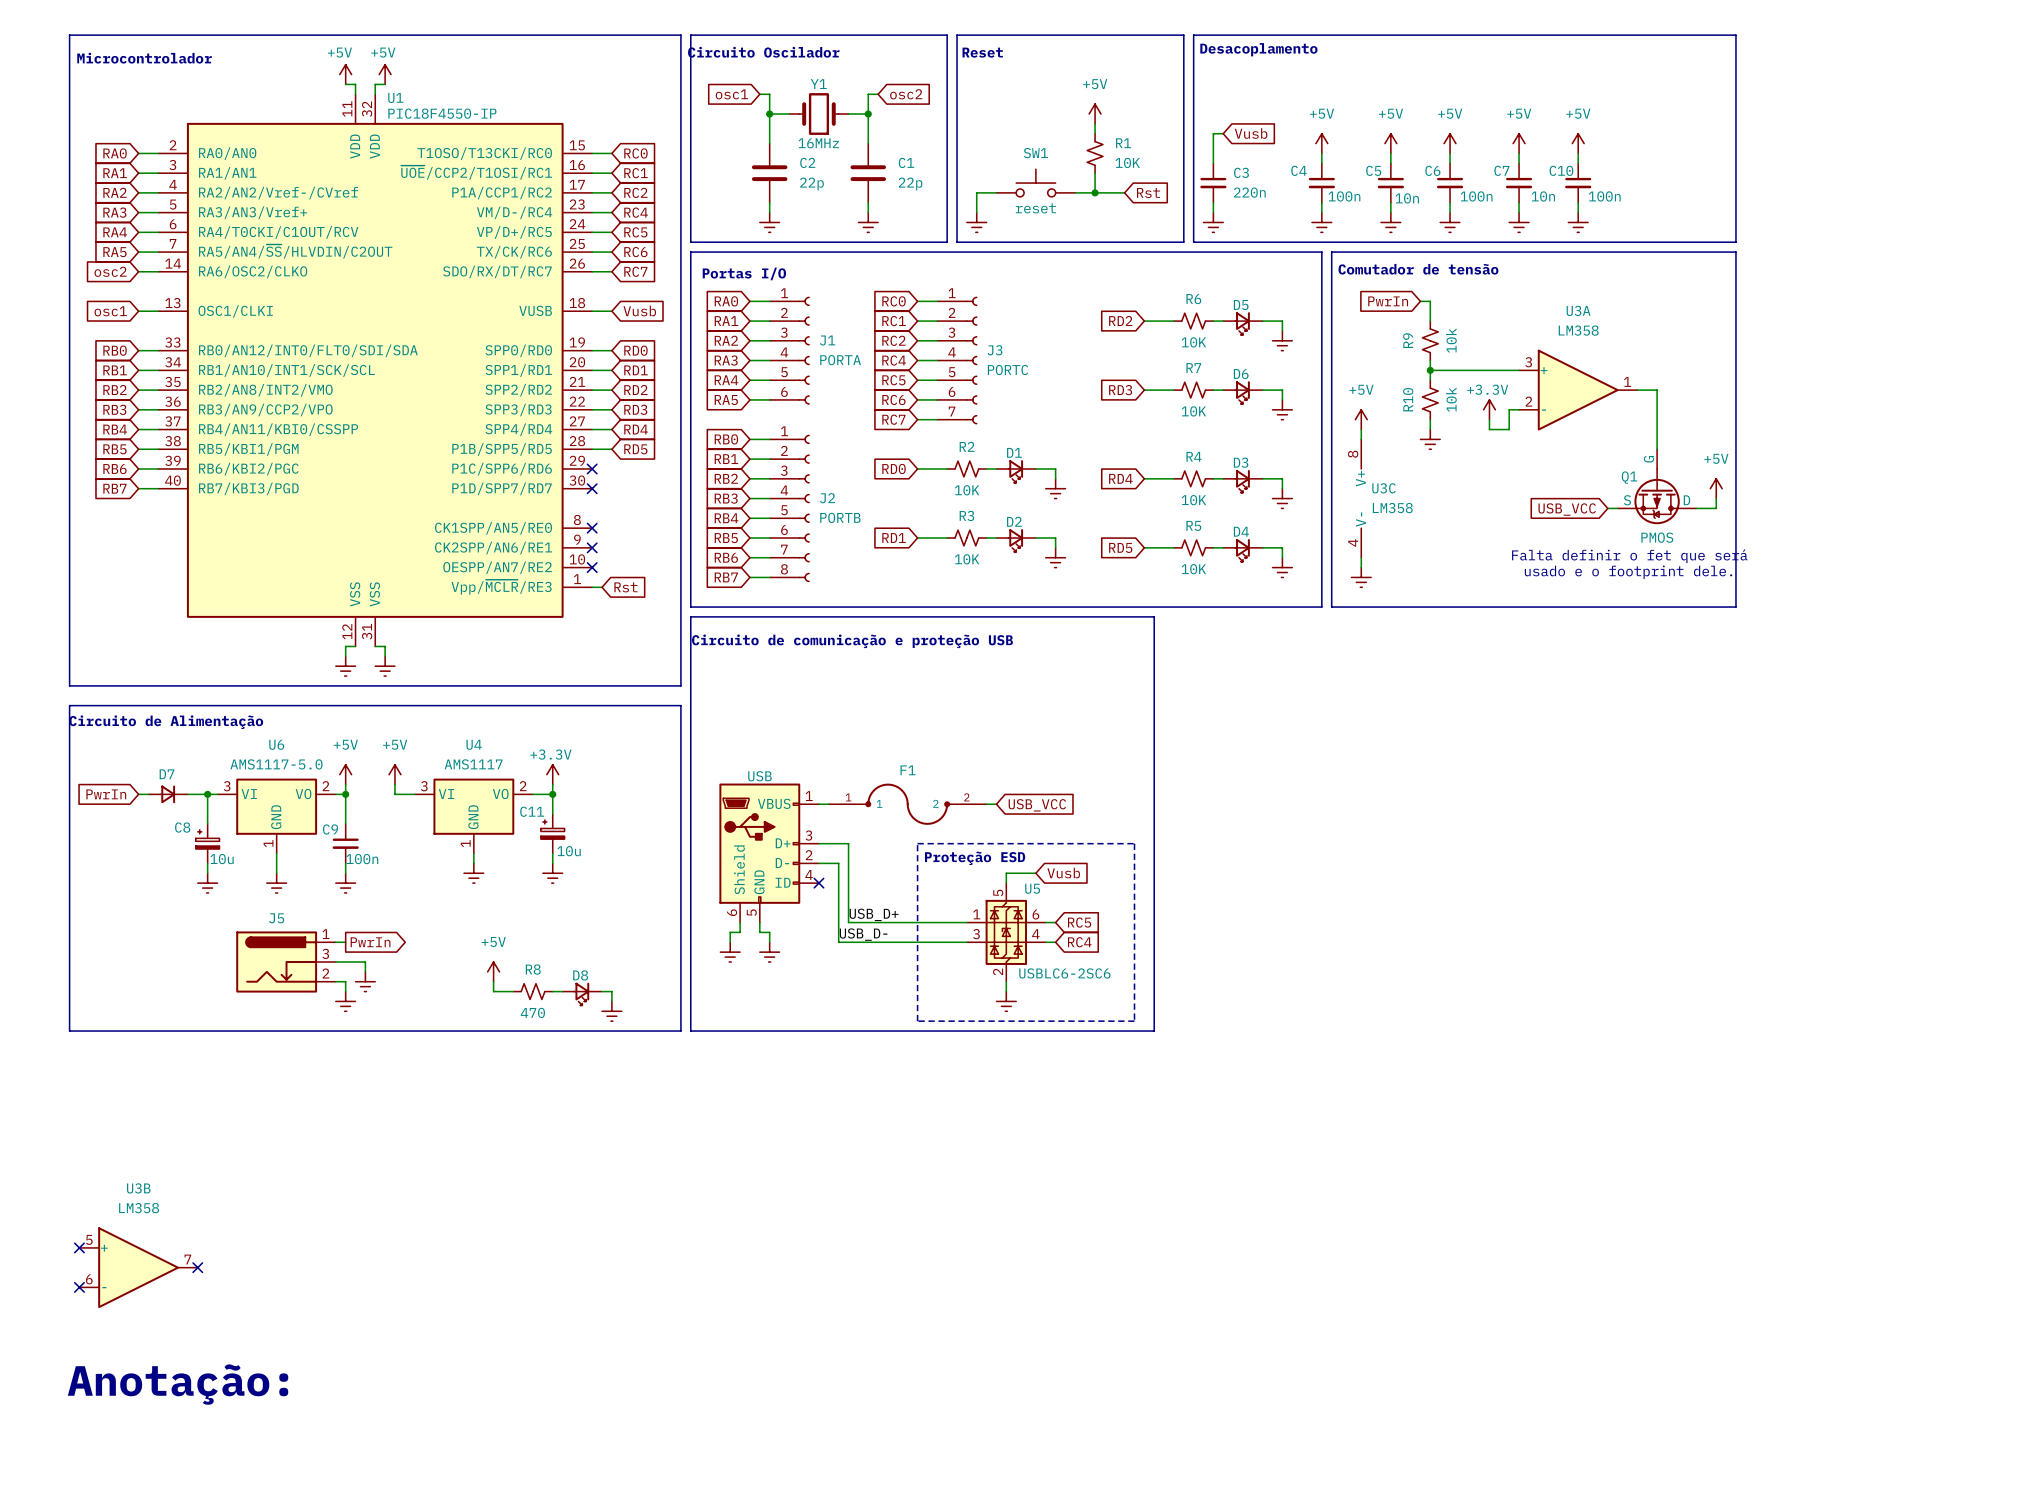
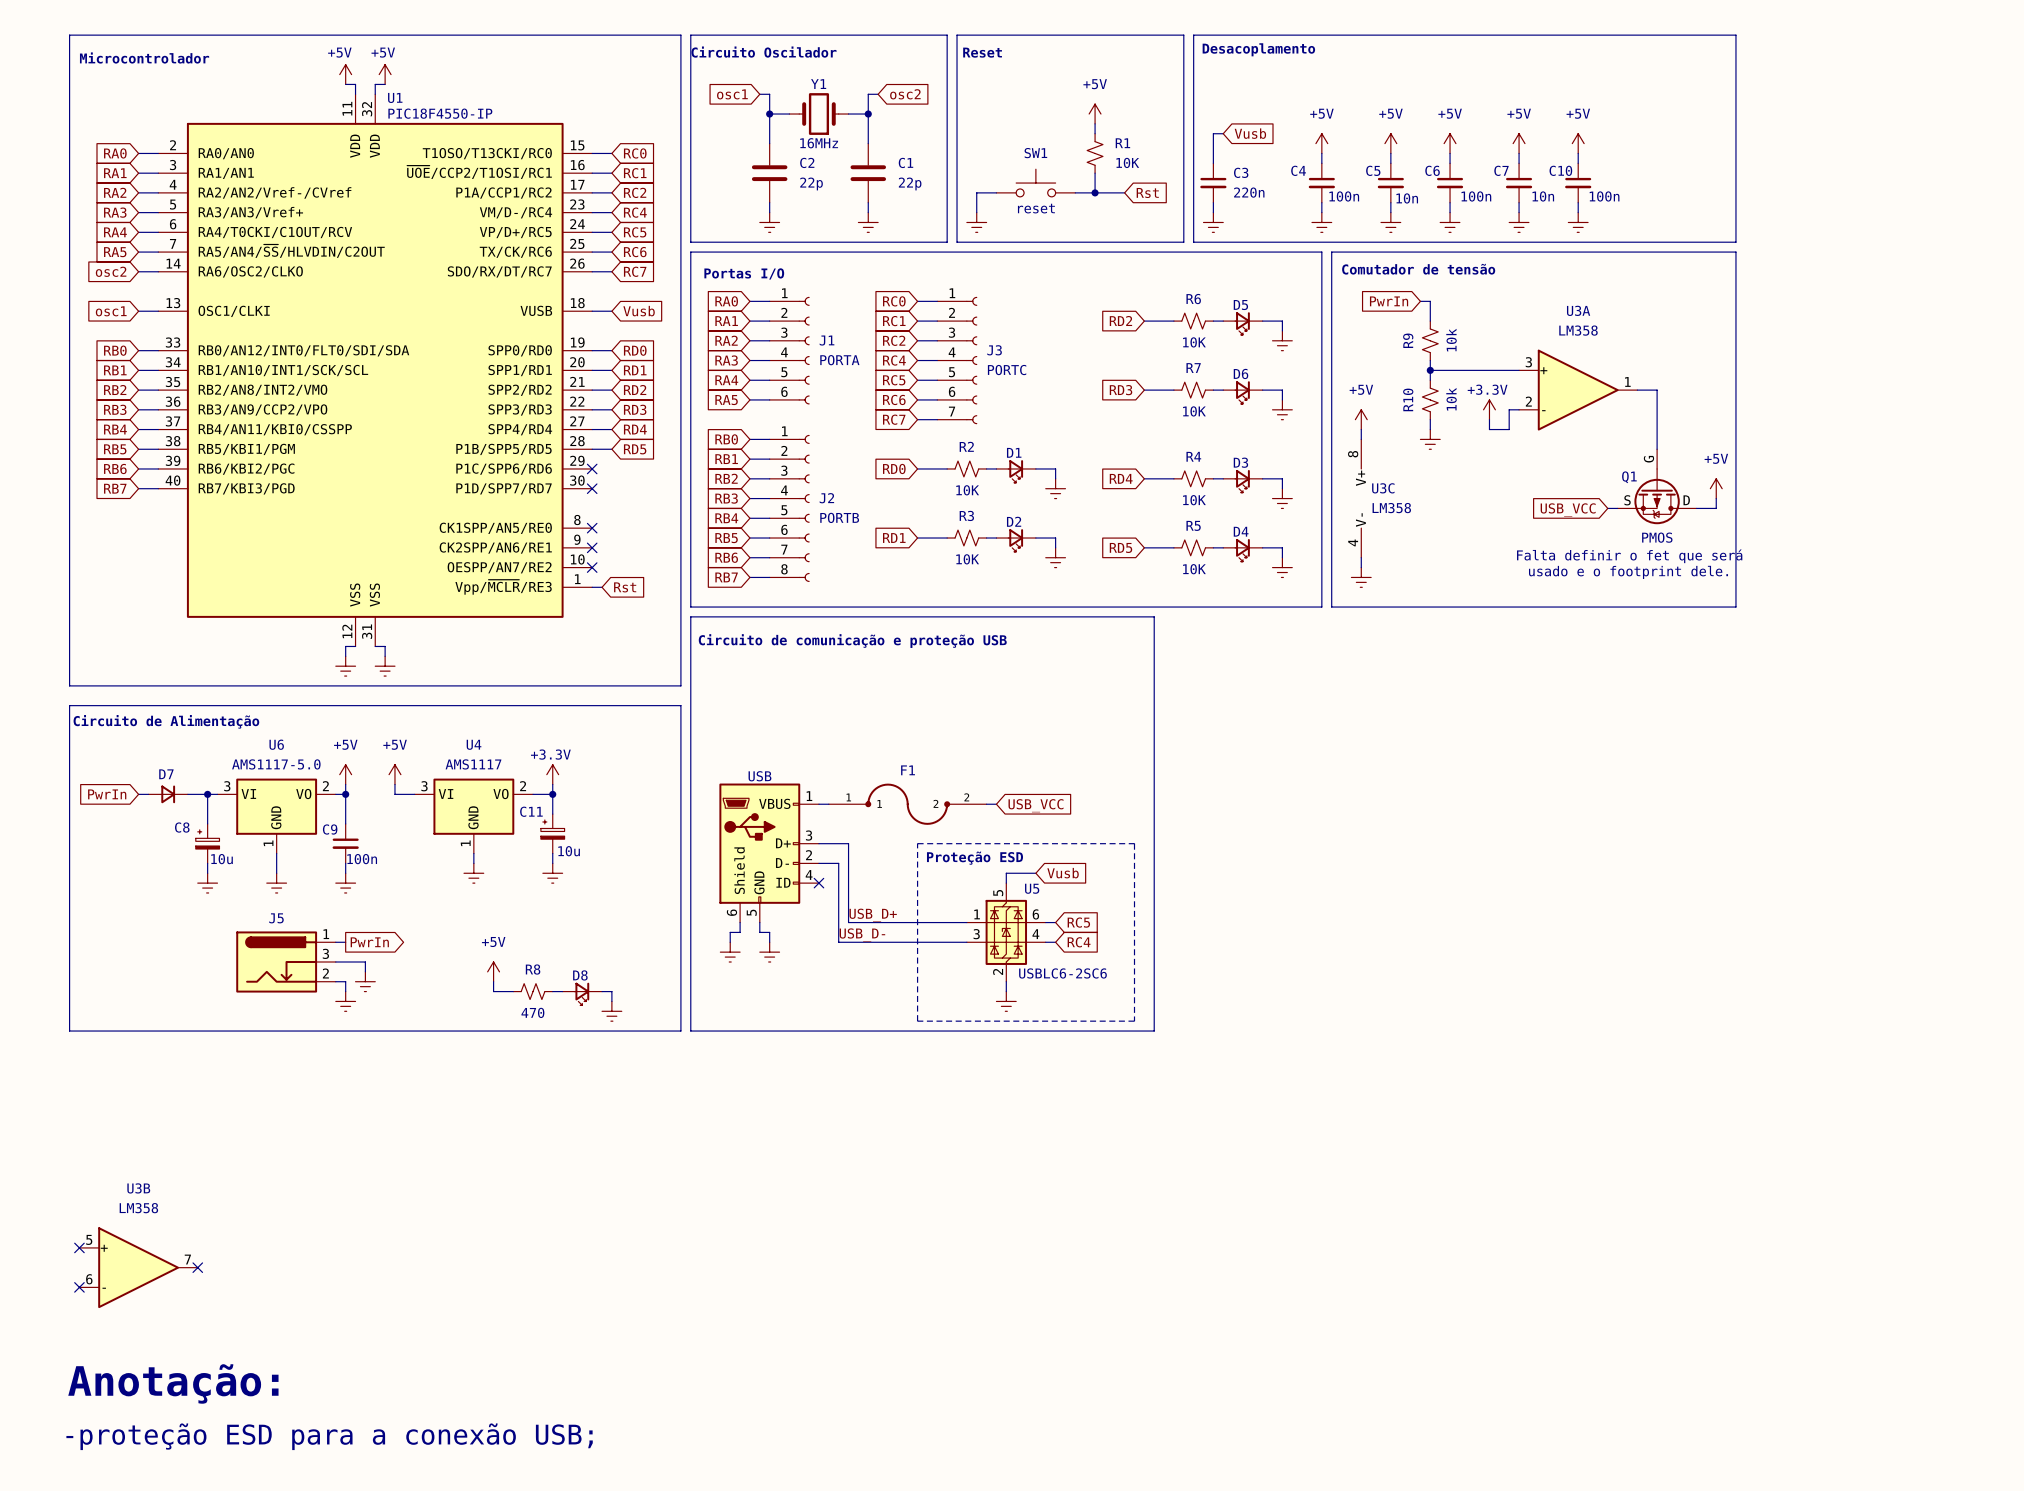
text: none -> -proteção ESD para a conexão USB; (329, 1436)

